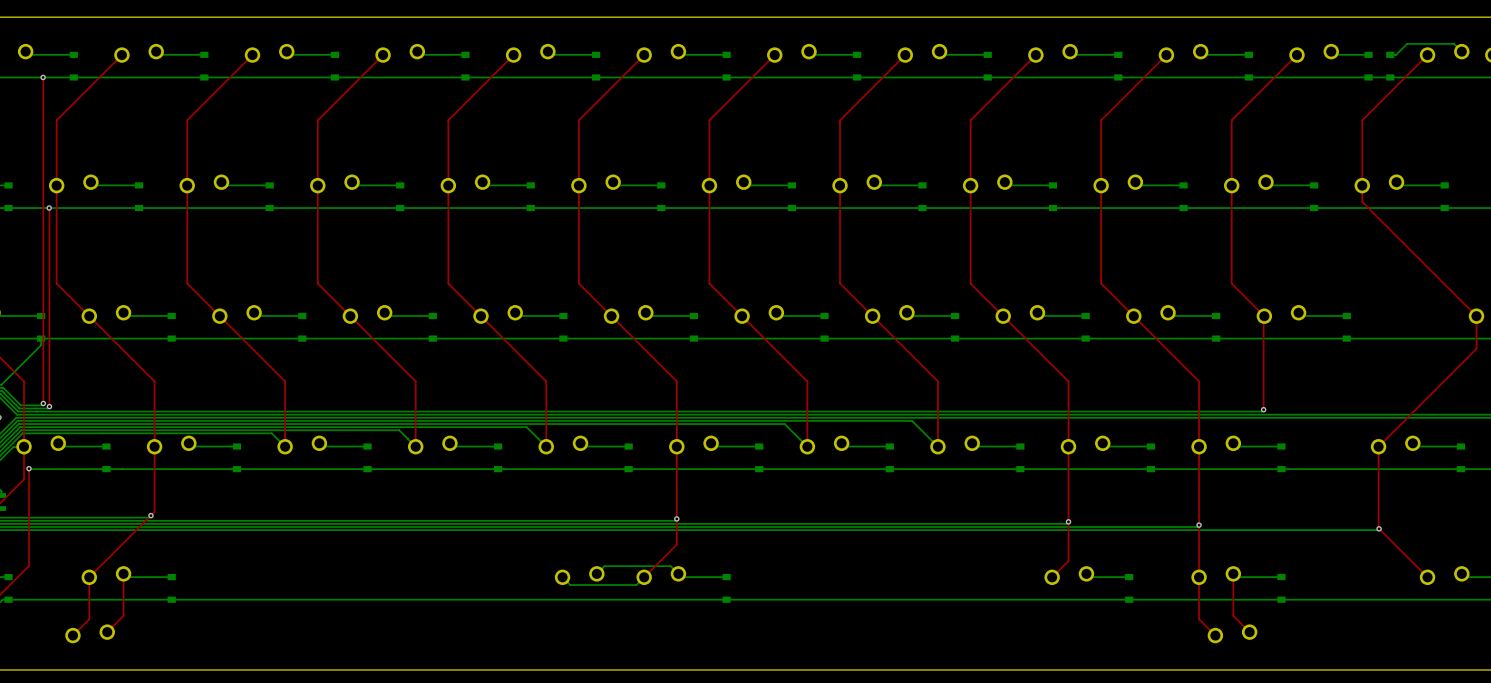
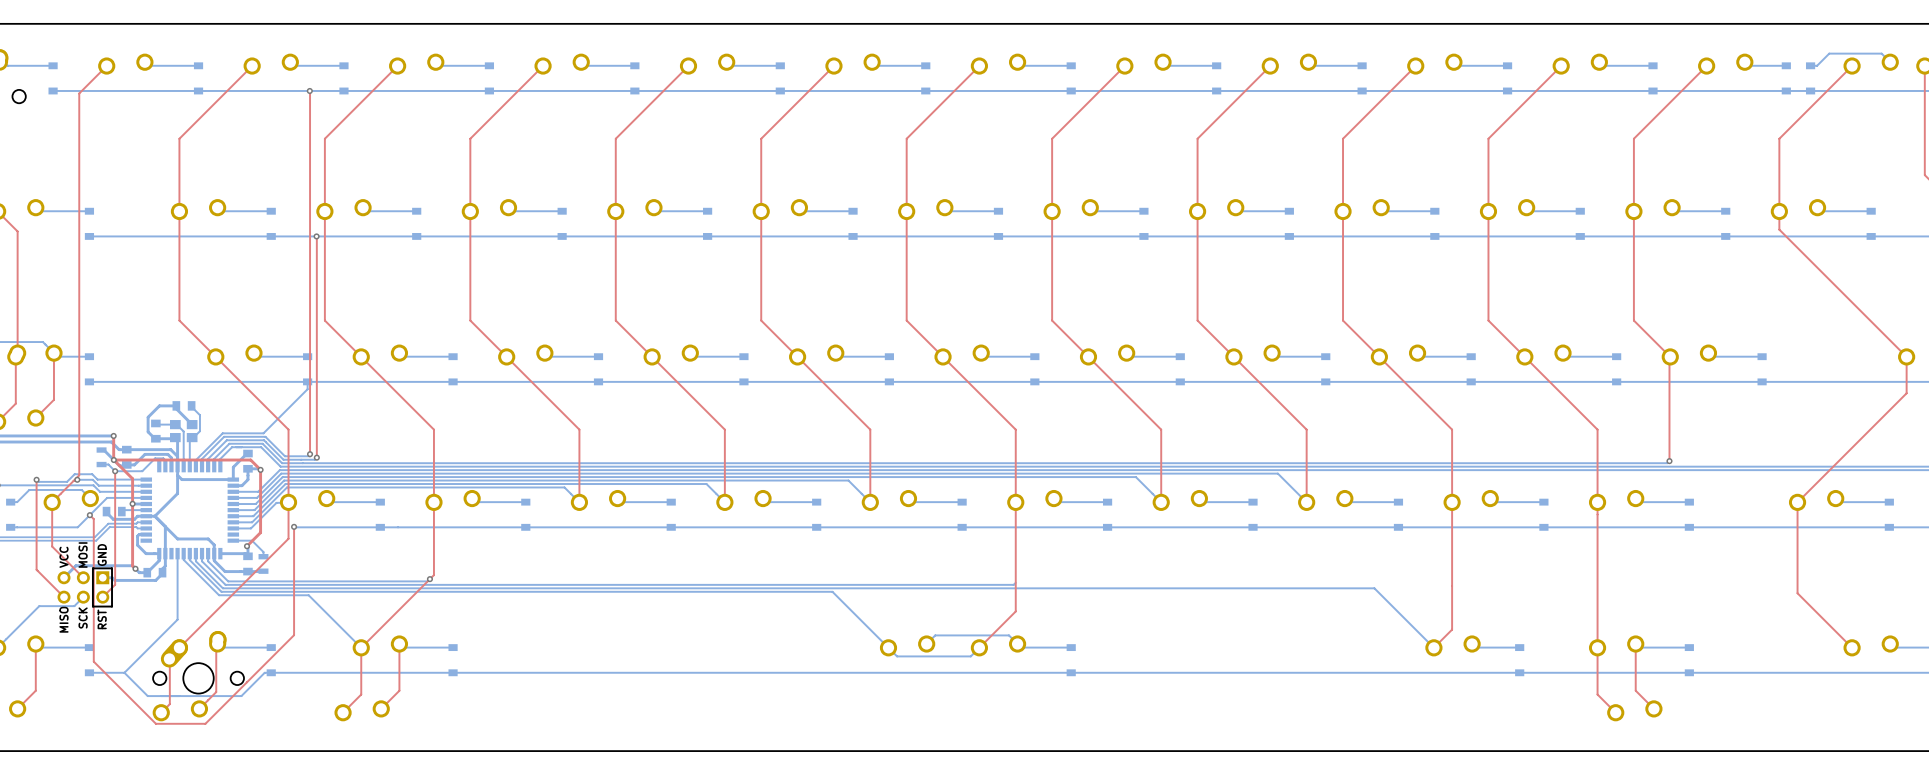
via: (676, 518) -> none
bottom track: (1068, 521) (1066, 523) (998, 523) -> (1433, 647) (1374, 588)
via: (1068, 521) -> none
bottom track: (1199, 525) (1197, 527) (512, 527) -> (888, 647) (832, 591)
via: (1199, 525) -> none
bottom track: (1379, 528) (42, 530) -> (361, 647) (308, 595)
via: (1379, 528) -> none

